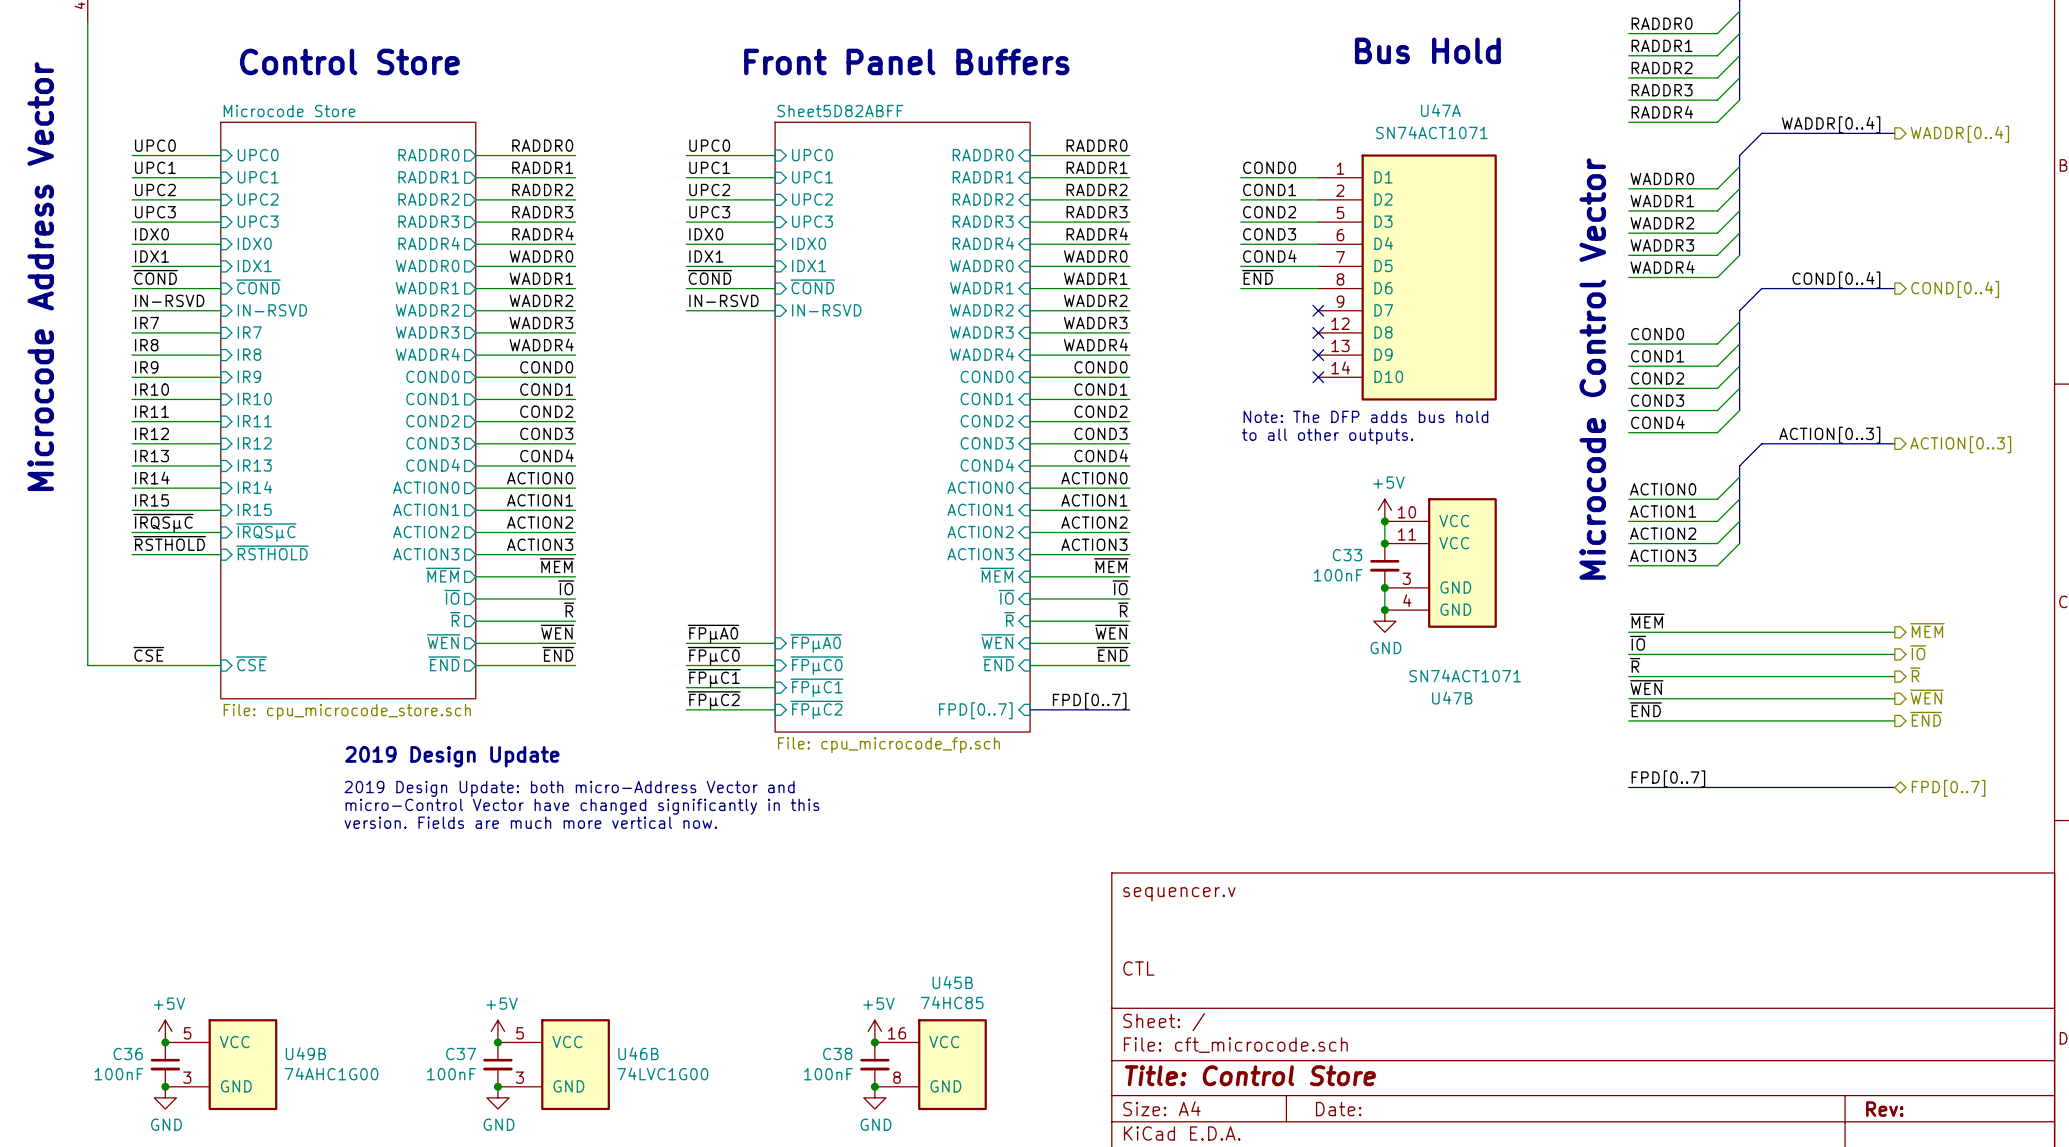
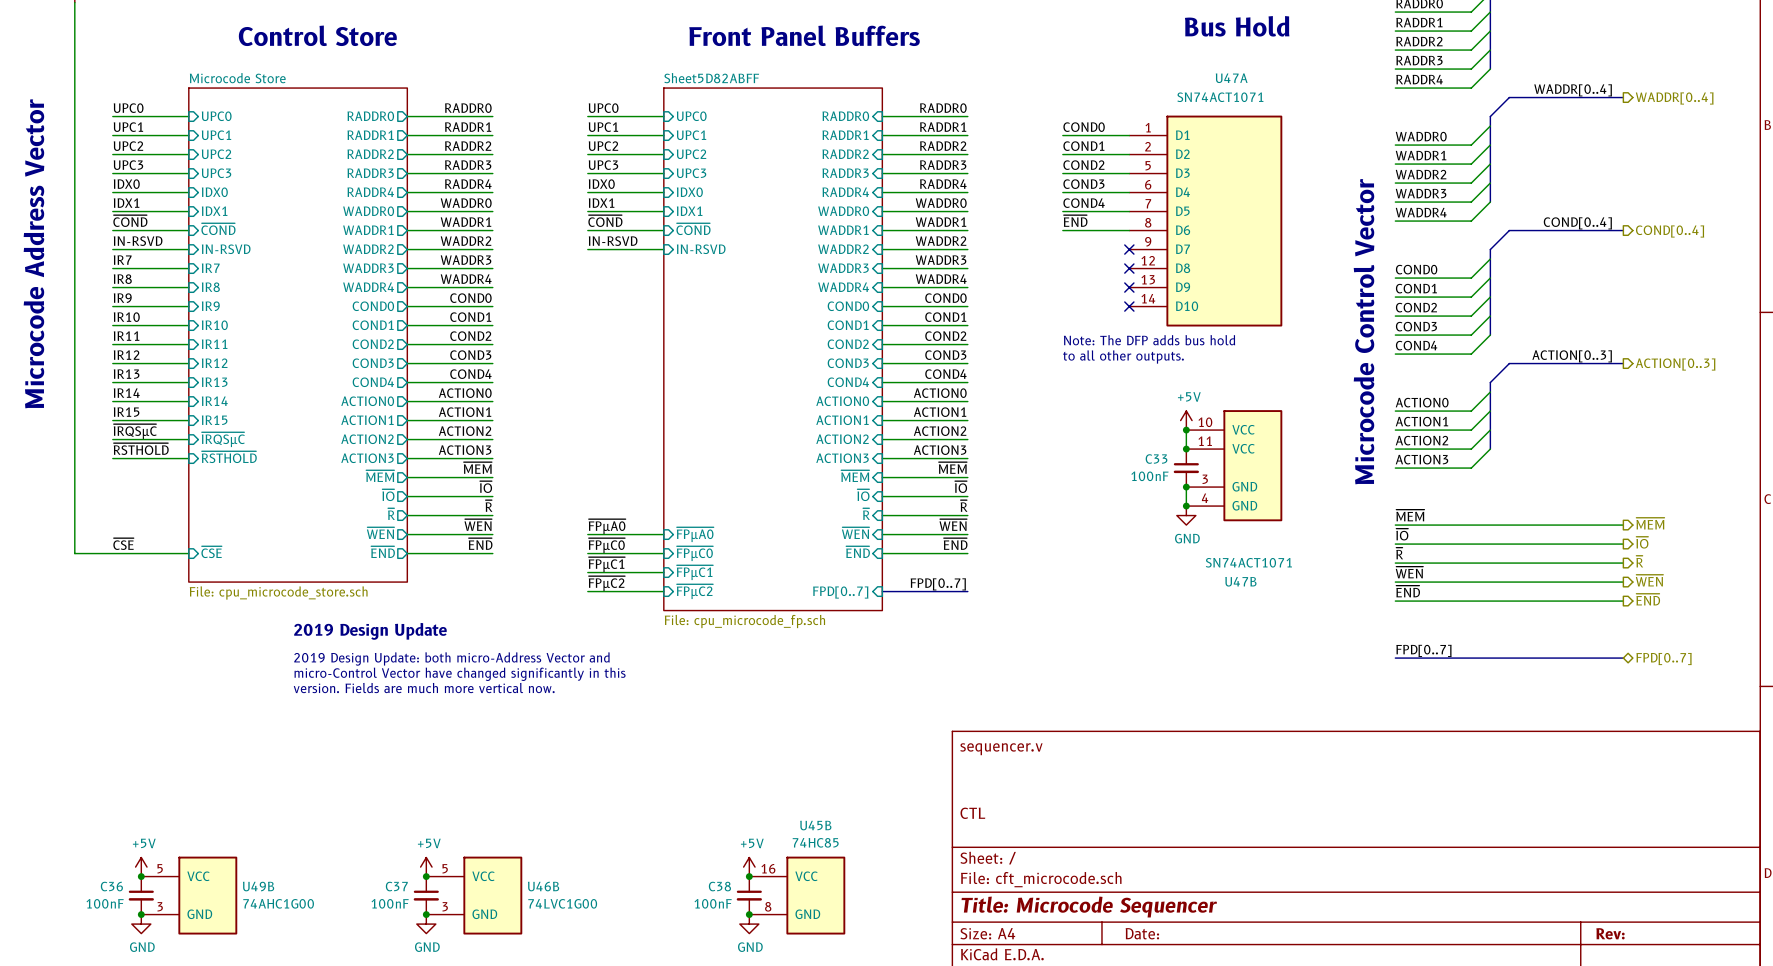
title block: Title: Control Store (1250, 1075) -> Title: Microcode Sequencer (1089, 907)

